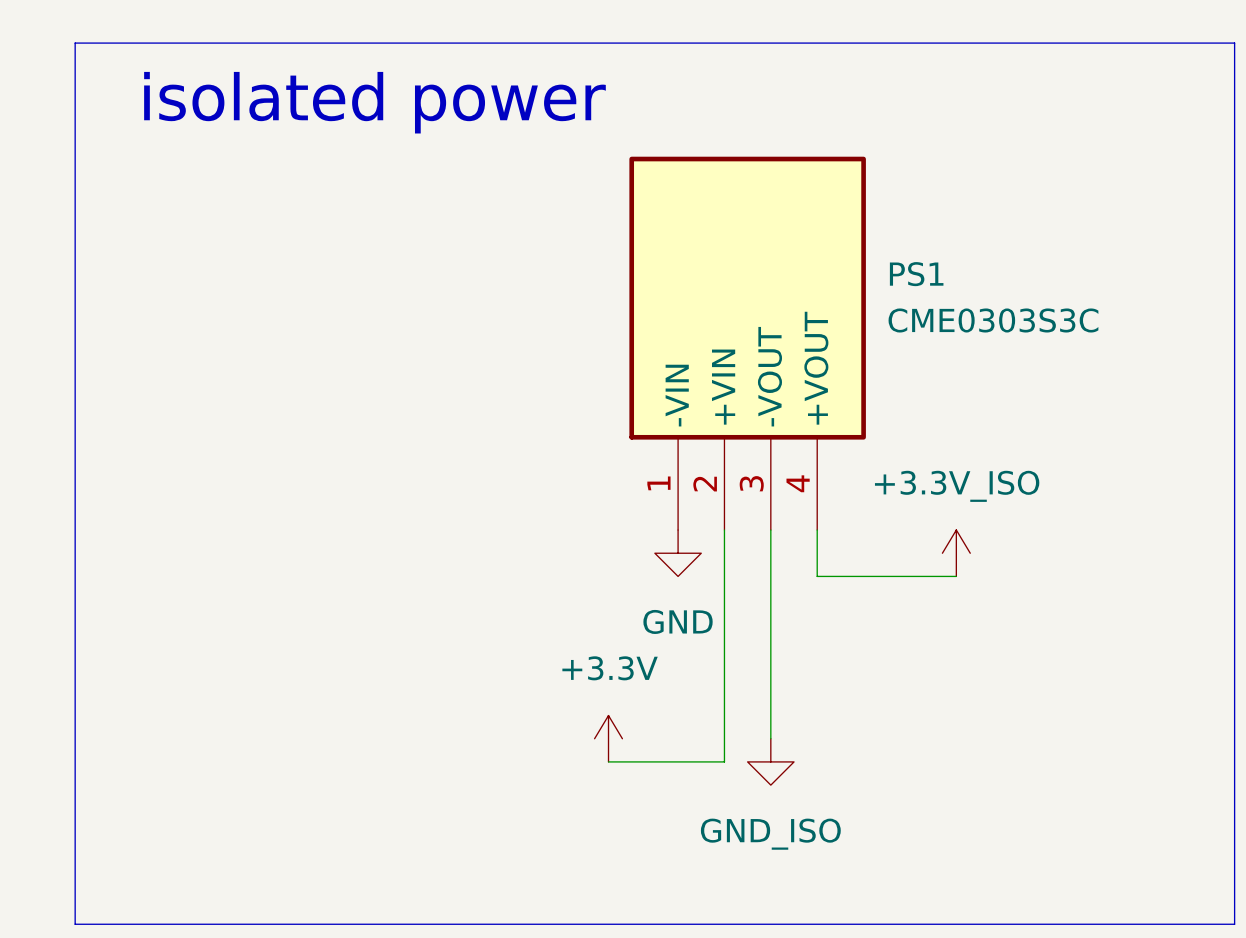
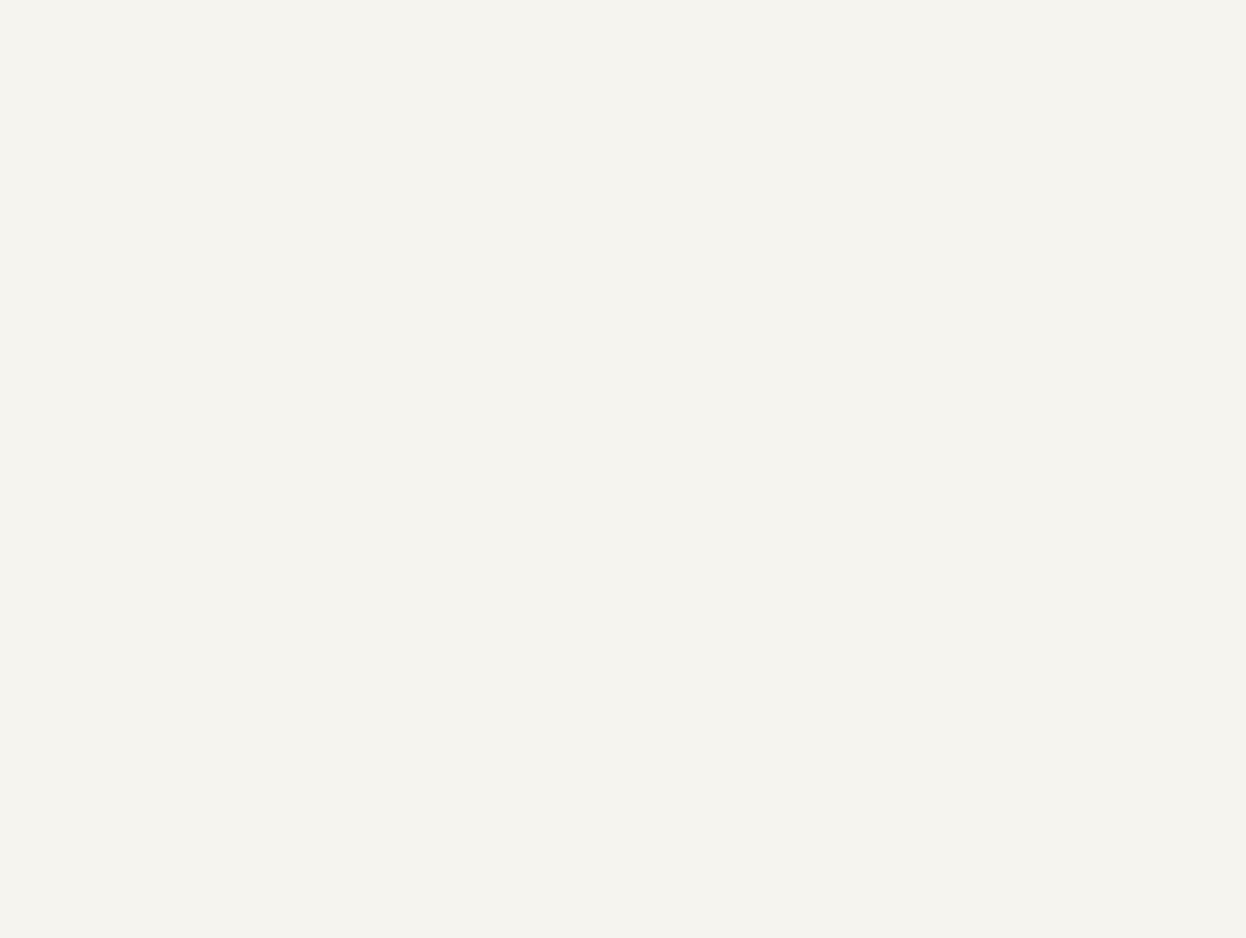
line: (75, 43) (1234, 43) (1234, 924) (75, 924) (75, 43) -> none
text: isolated power (374, 102) -> none
PS1: CME0303S3C (747, 343) -> none
wire: (724, 530) (724, 761) (608, 761) -> none
wire: (770, 530) (770, 738) -> none
wire: (817, 530) (817, 576) (956, 576) -> none
power symbol: GND (678, 553) -> none
power symbol: +3.3V_ISO (956, 553) -> none
power symbol: +3.3V (608, 738) -> none
power symbol: GND_ISO (770, 761) -> none

